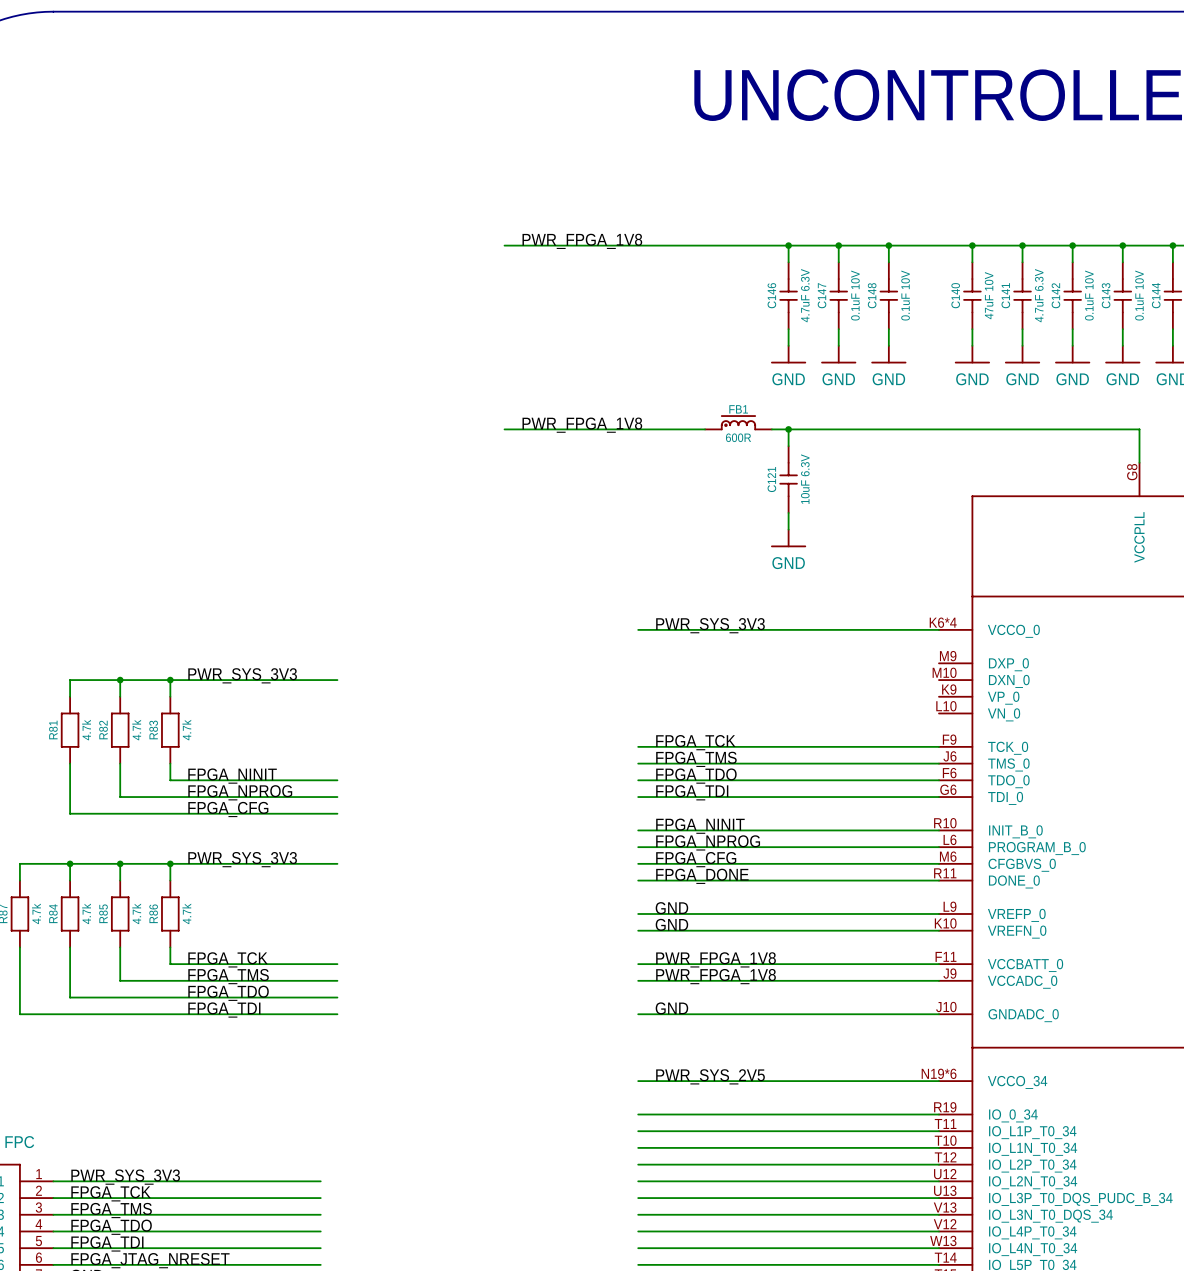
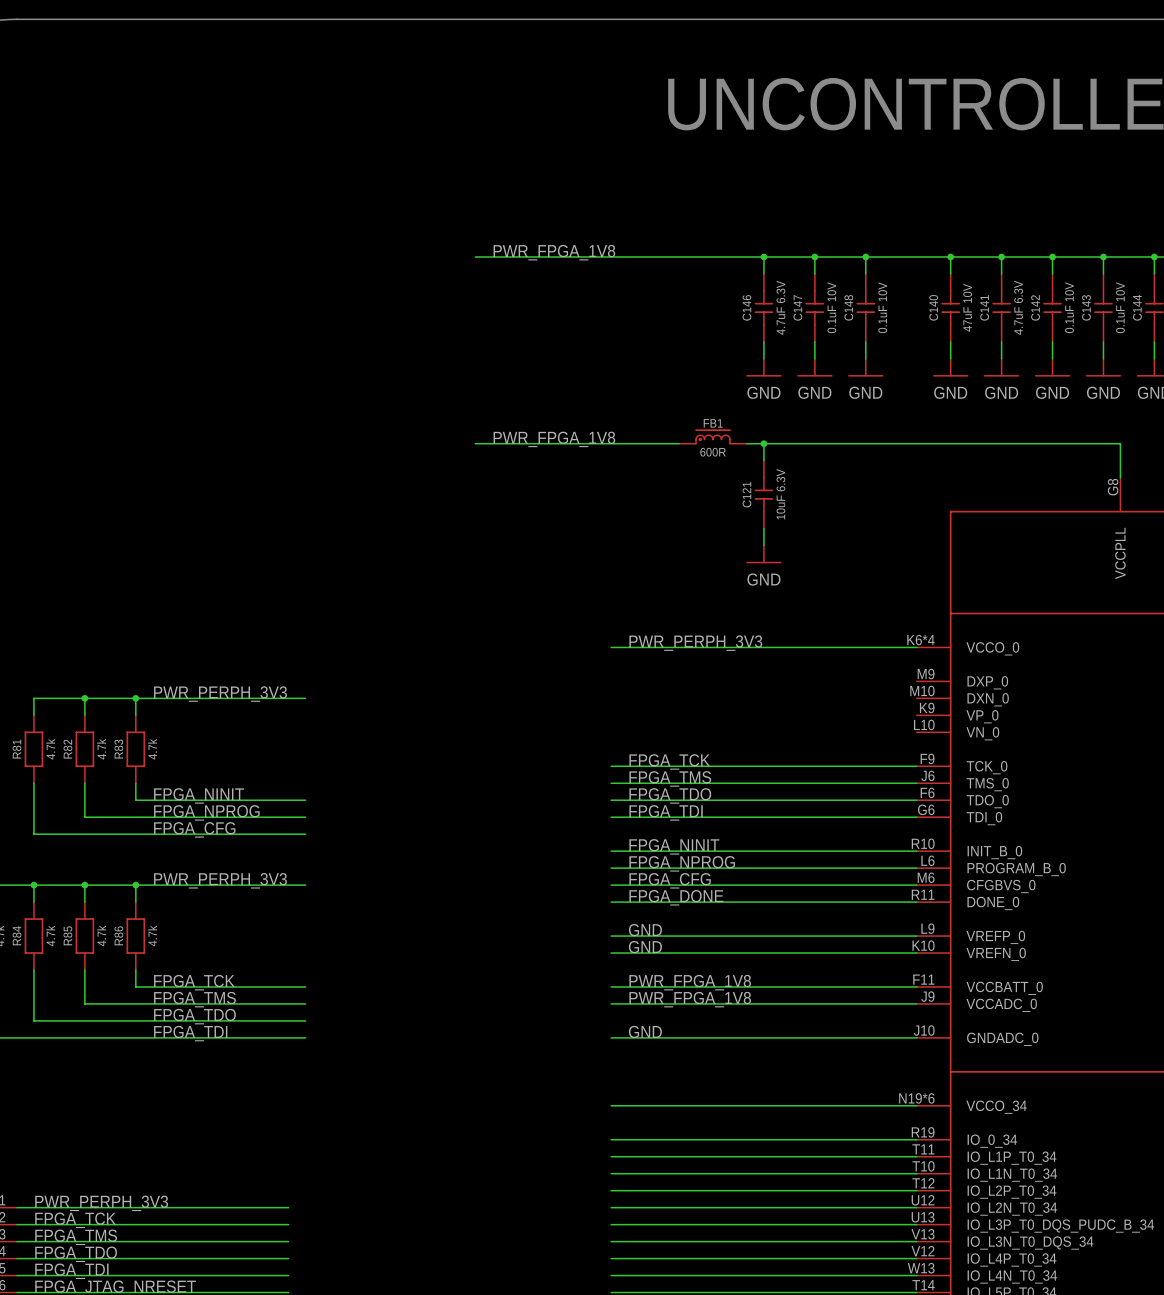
label: PWR_SYS_3V3 (710, 625) -> PWR_PERPH_3V3 (695, 643)
label: PWR_SYS_3V3 (242, 675) -> PWR_PERPH_3V3 (220, 694)
label: PWR_SYS_3V3 (242, 859) -> PWR_PERPH_3V3 (220, 880)
label: PWR_SYS_2V5 (710, 1076) -> none
label: PWR_SYS_3V3 (125, 1177) -> PWR_PERPH_3V3 (101, 1203)

